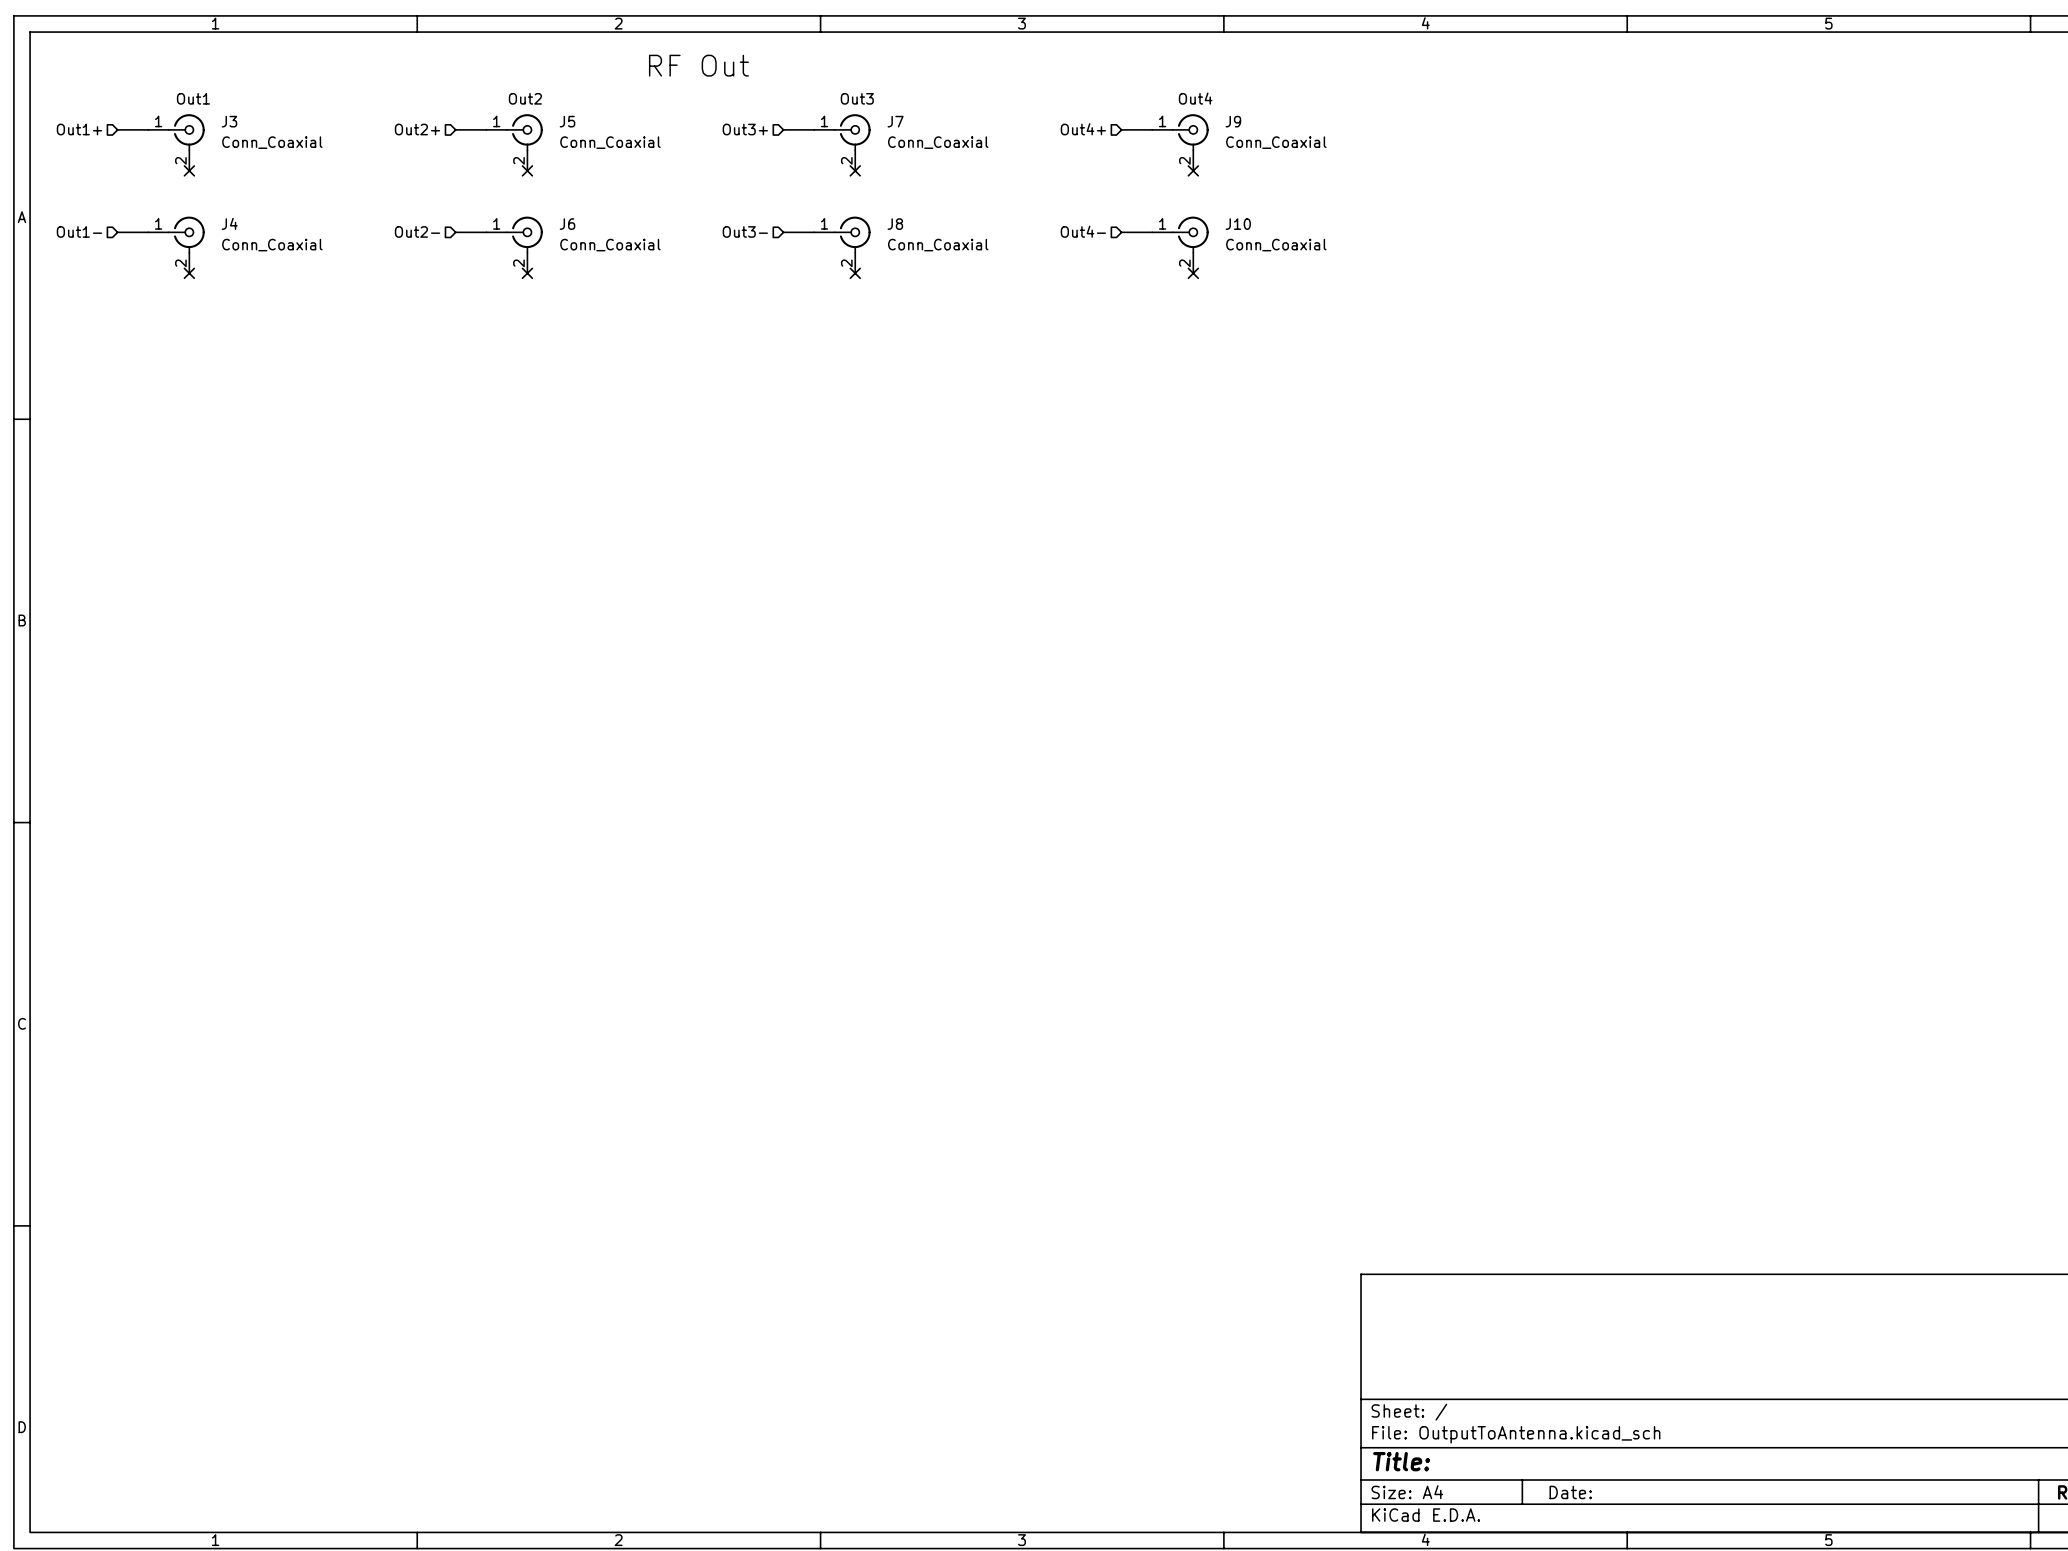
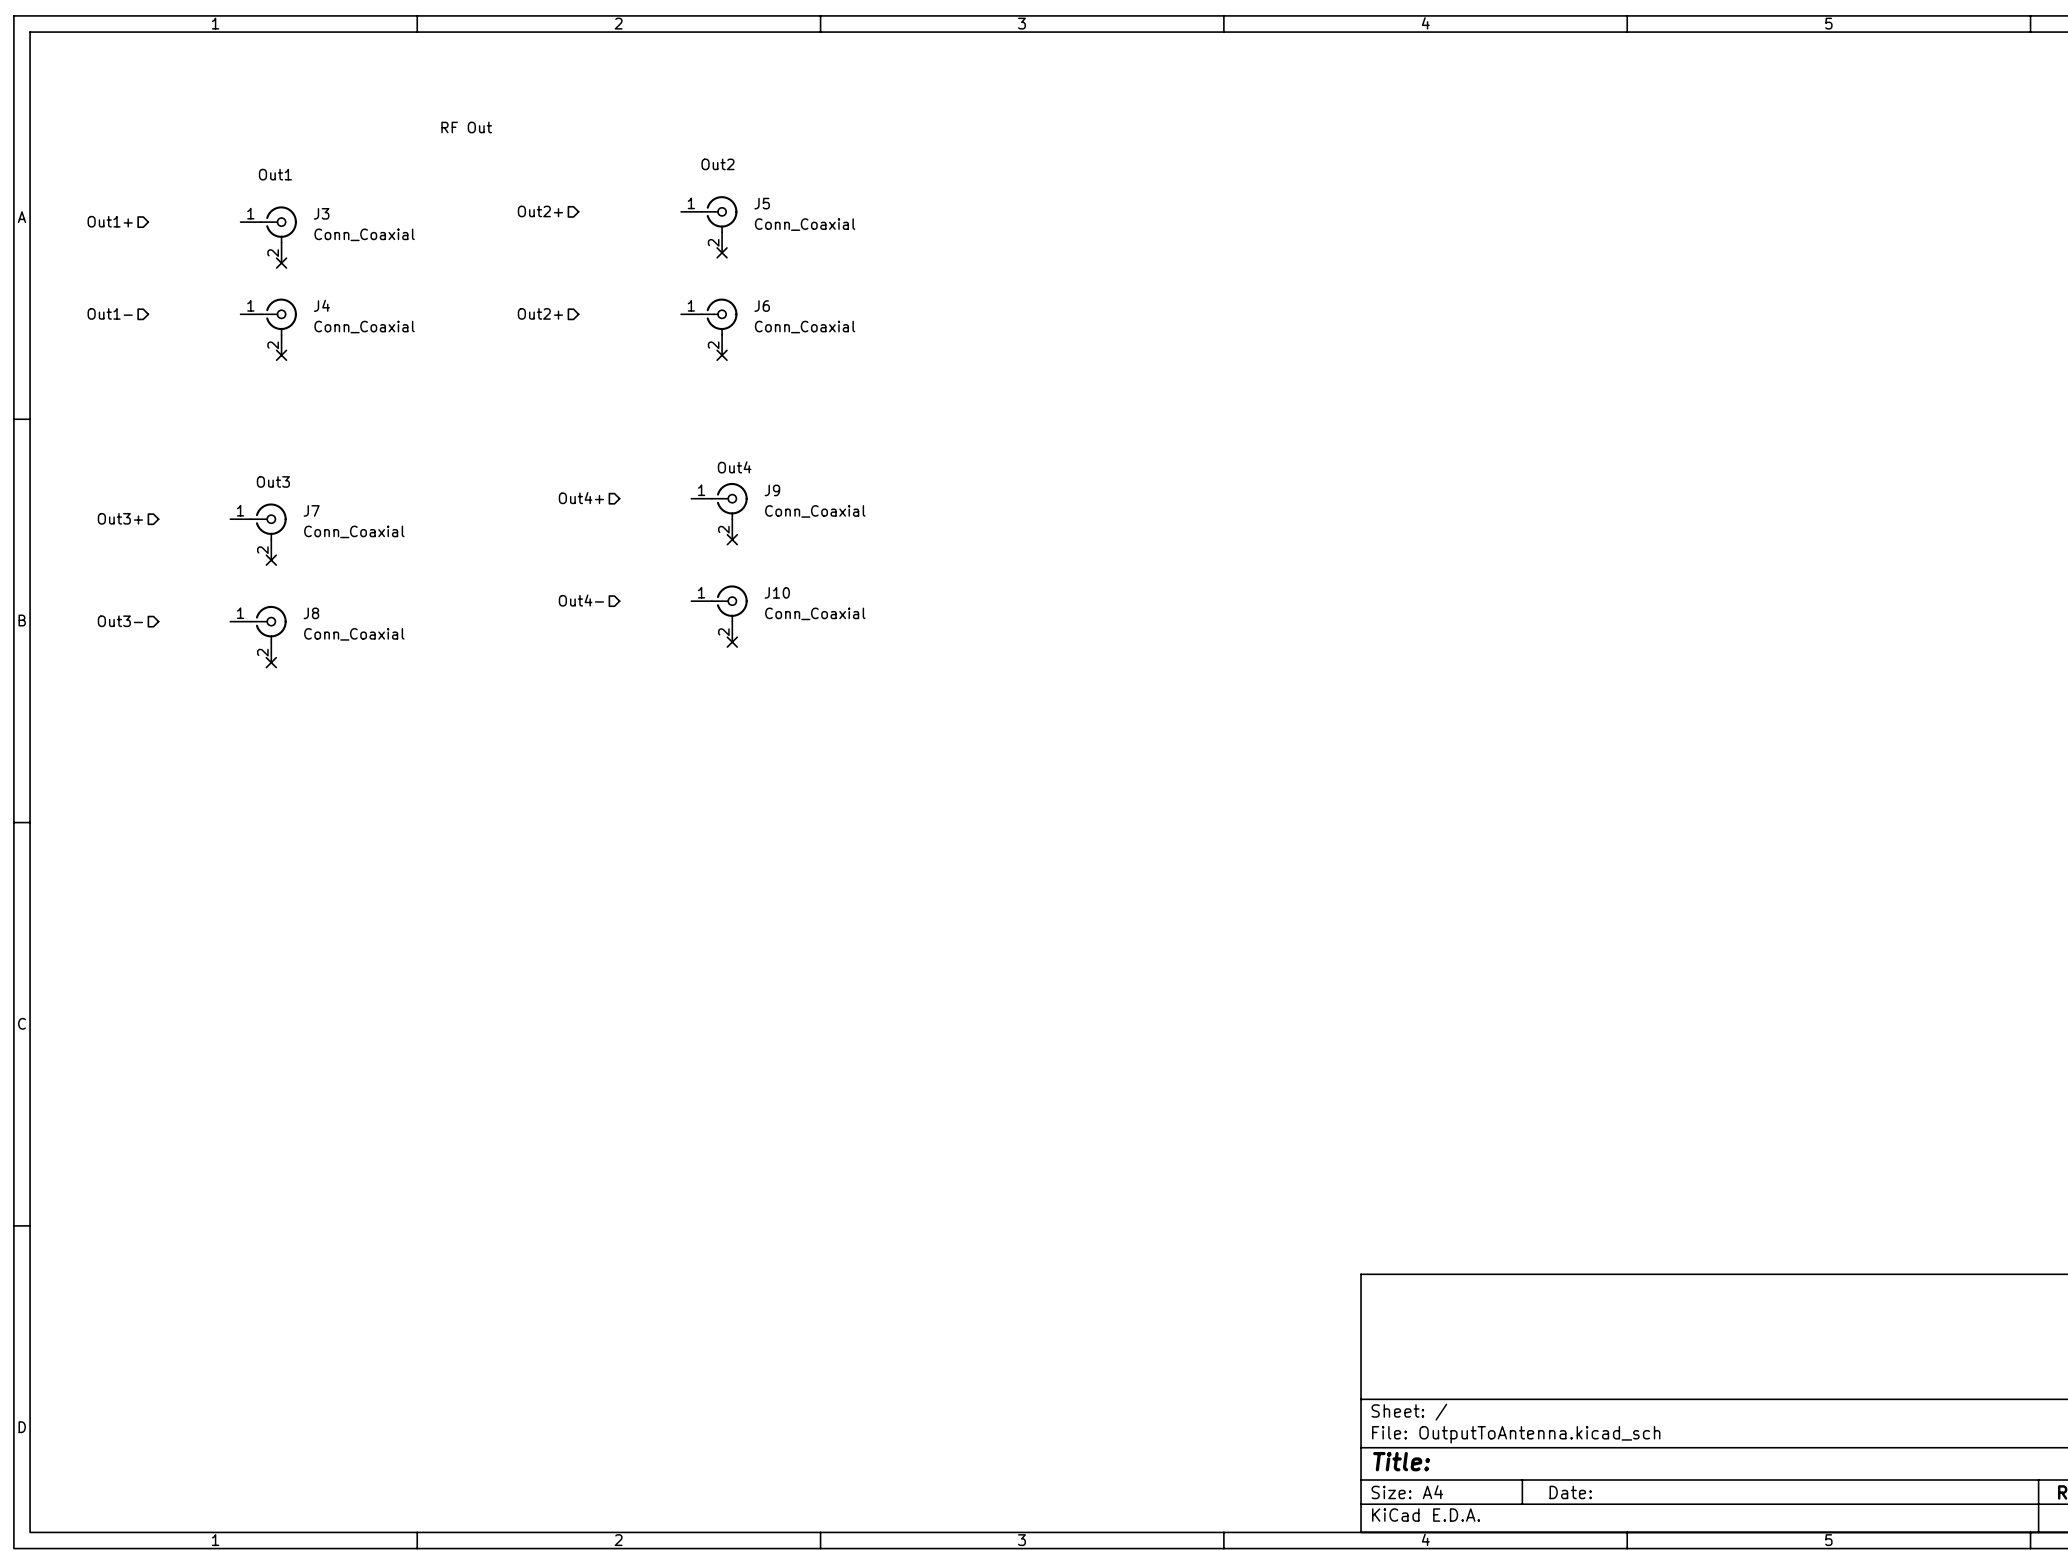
text: RF Out (698, 65) -> none
text position: Out1 (193, 98) -> Out1 (275, 174)
text: Out2 (525, 98) -> none
text: Out3 (857, 98) -> none
text: Out4 (1195, 98) -> none
text: none -> RF Out (466, 127)
hierarchical label position: Out1+ (79, 129) -> Out1+ (110, 221)
wire: (117, 129) (148, 129) -> none
hierarchical label: Out2+ (417, 129) -> none
wire: (455, 129) (486, 129) -> none
hierarchical label: Out3+ (745, 129) -> none
wire: (783, 129) (814, 129) -> none
hierarchical label: Out4+ (1083, 129) -> none
wire: (1121, 129) (1152, 129) -> none
J3 position: (176, 142) -> (268, 234)
J5 position: (514, 142) -> (709, 224)
J7 position: (842, 142) -> (258, 531)
J9 position: (1180, 142) -> (719, 511)
text: none -> Out2 (717, 164)
no-connect mark: (189, 170) -> none
no-connect mark: (527, 170) -> none
no-connect mark: (855, 170) -> none
no-connect mark: (1193, 170) -> none
hierarchical label: none -> Out2+ (540, 211)
hierarchical label position: Out1- (79, 231) -> Out1- (110, 313)
hierarchical label: Out2- (417, 231) -> none
hierarchical label: Out3- (745, 231) -> none
hierarchical label: Out4- (1083, 231) -> none
wire: (117, 232) (148, 232) -> none
wire: (455, 232) (486, 232) -> none
wire: (783, 232) (814, 232) -> none
wire: (1121, 232) (1152, 232) -> none
J4 position: (176, 244) -> (268, 326)
J6 position: (514, 244) -> (709, 326)
J8 position: (842, 244) -> (258, 634)
J10 position: (1180, 244) -> (719, 613)
no-connect mark: none -> (722, 252)
no-connect mark: none -> (281, 263)
no-connect mark: (189, 273) -> none
no-connect mark: (527, 273) -> none
no-connect mark: (855, 273) -> none
no-connect mark: (1193, 273) -> none
hierarchical label: none -> Out2+ (540, 313)
no-connect mark: none -> (281, 355)
no-connect mark: none -> (722, 355)
text: none -> Out4 (734, 467)
text: none -> Out3 (273, 481)
hierarchical label: none -> Out4+ (581, 498)
hierarchical label: none -> Out3+ (120, 518)
no-connect mark: none -> (732, 539)
no-connect mark: none -> (271, 560)
hierarchical label: none -> Out4- (581, 600)
hierarchical label: none -> Out3- (120, 621)
no-connect mark: none -> (732, 642)
no-connect mark: none -> (271, 662)

